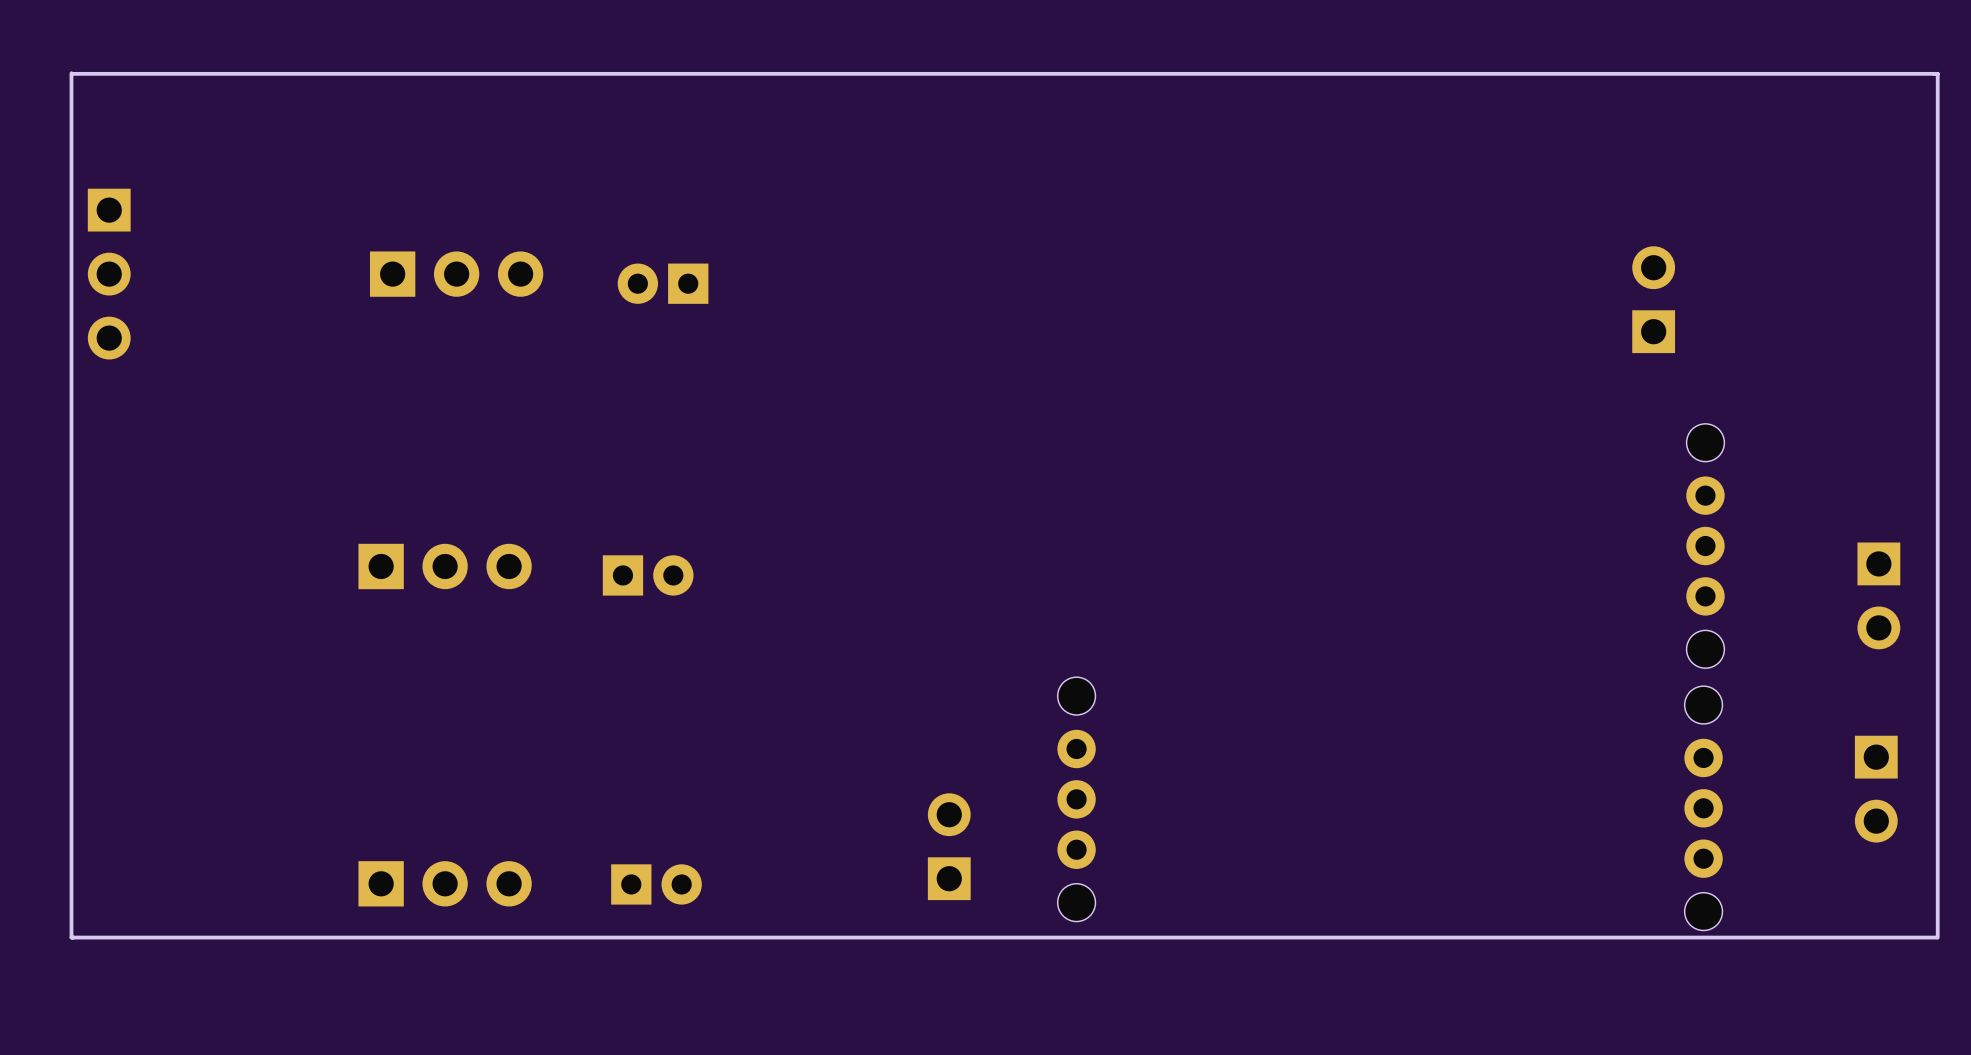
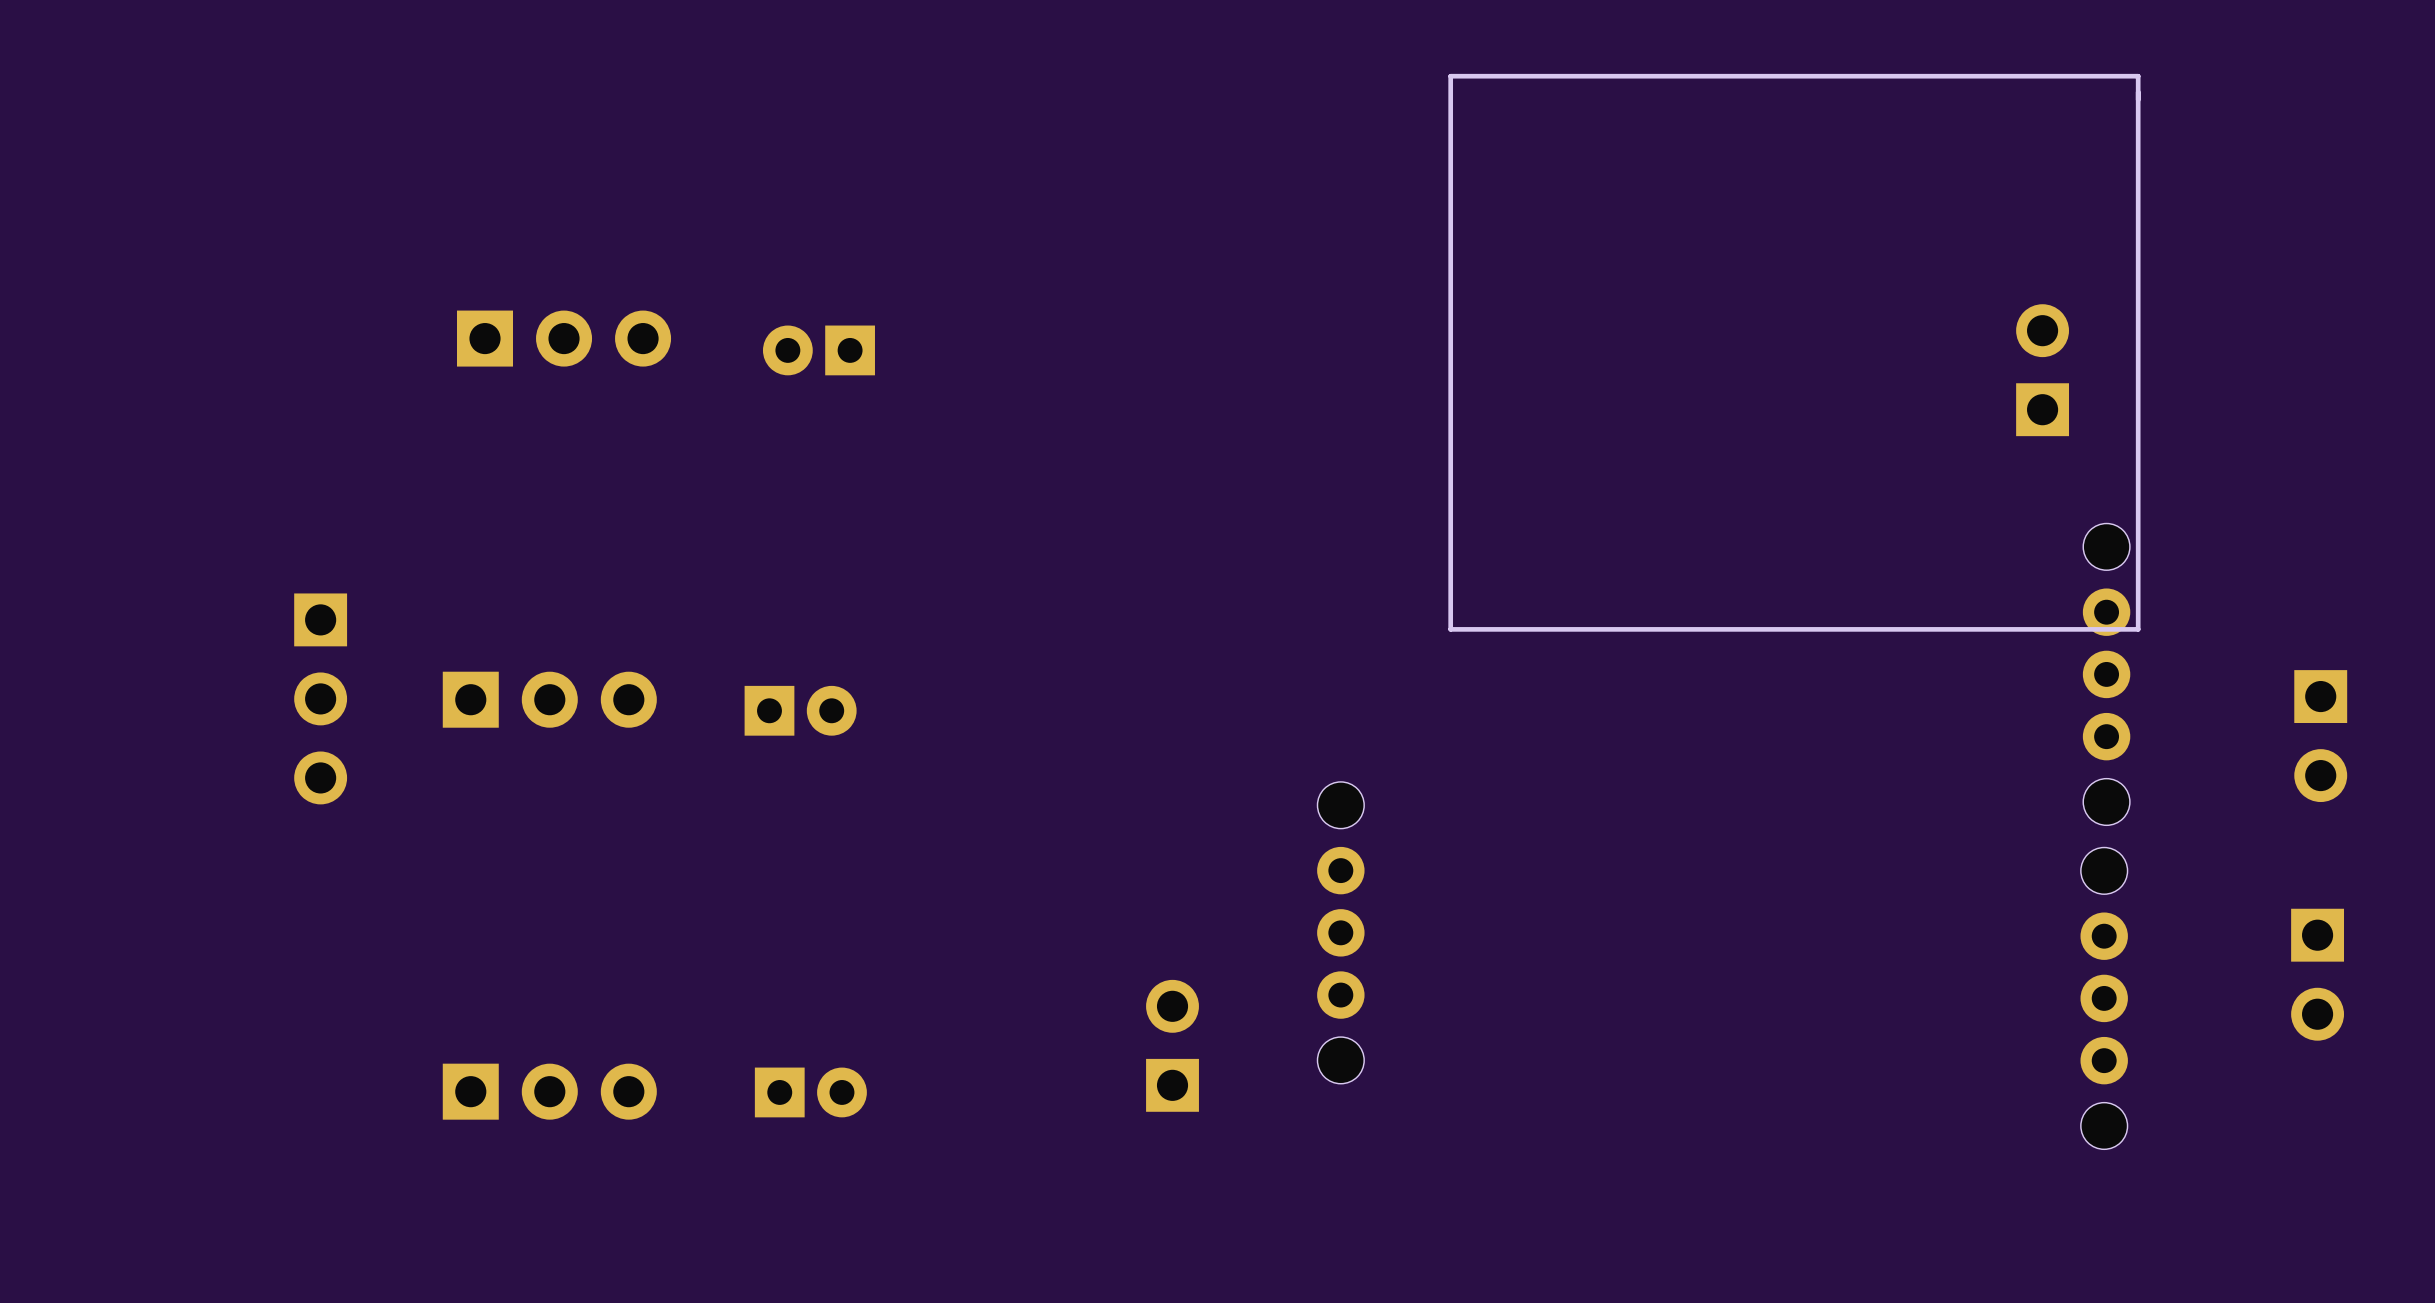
board edge: none -> (2138, 76) (2138, 629) (1450, 629) (1450, 76) (2138, 76)
board edge: (71, 73) (71, 937) (73, 937) -> none
board edge: (72, 73) (1937, 73) (1937, 937) -> none
part position: (109, 274) -> (320, 698)
part position: (1076, 799) -> (1340, 932)
board edge: (1937, 937) (74, 937) -> none

